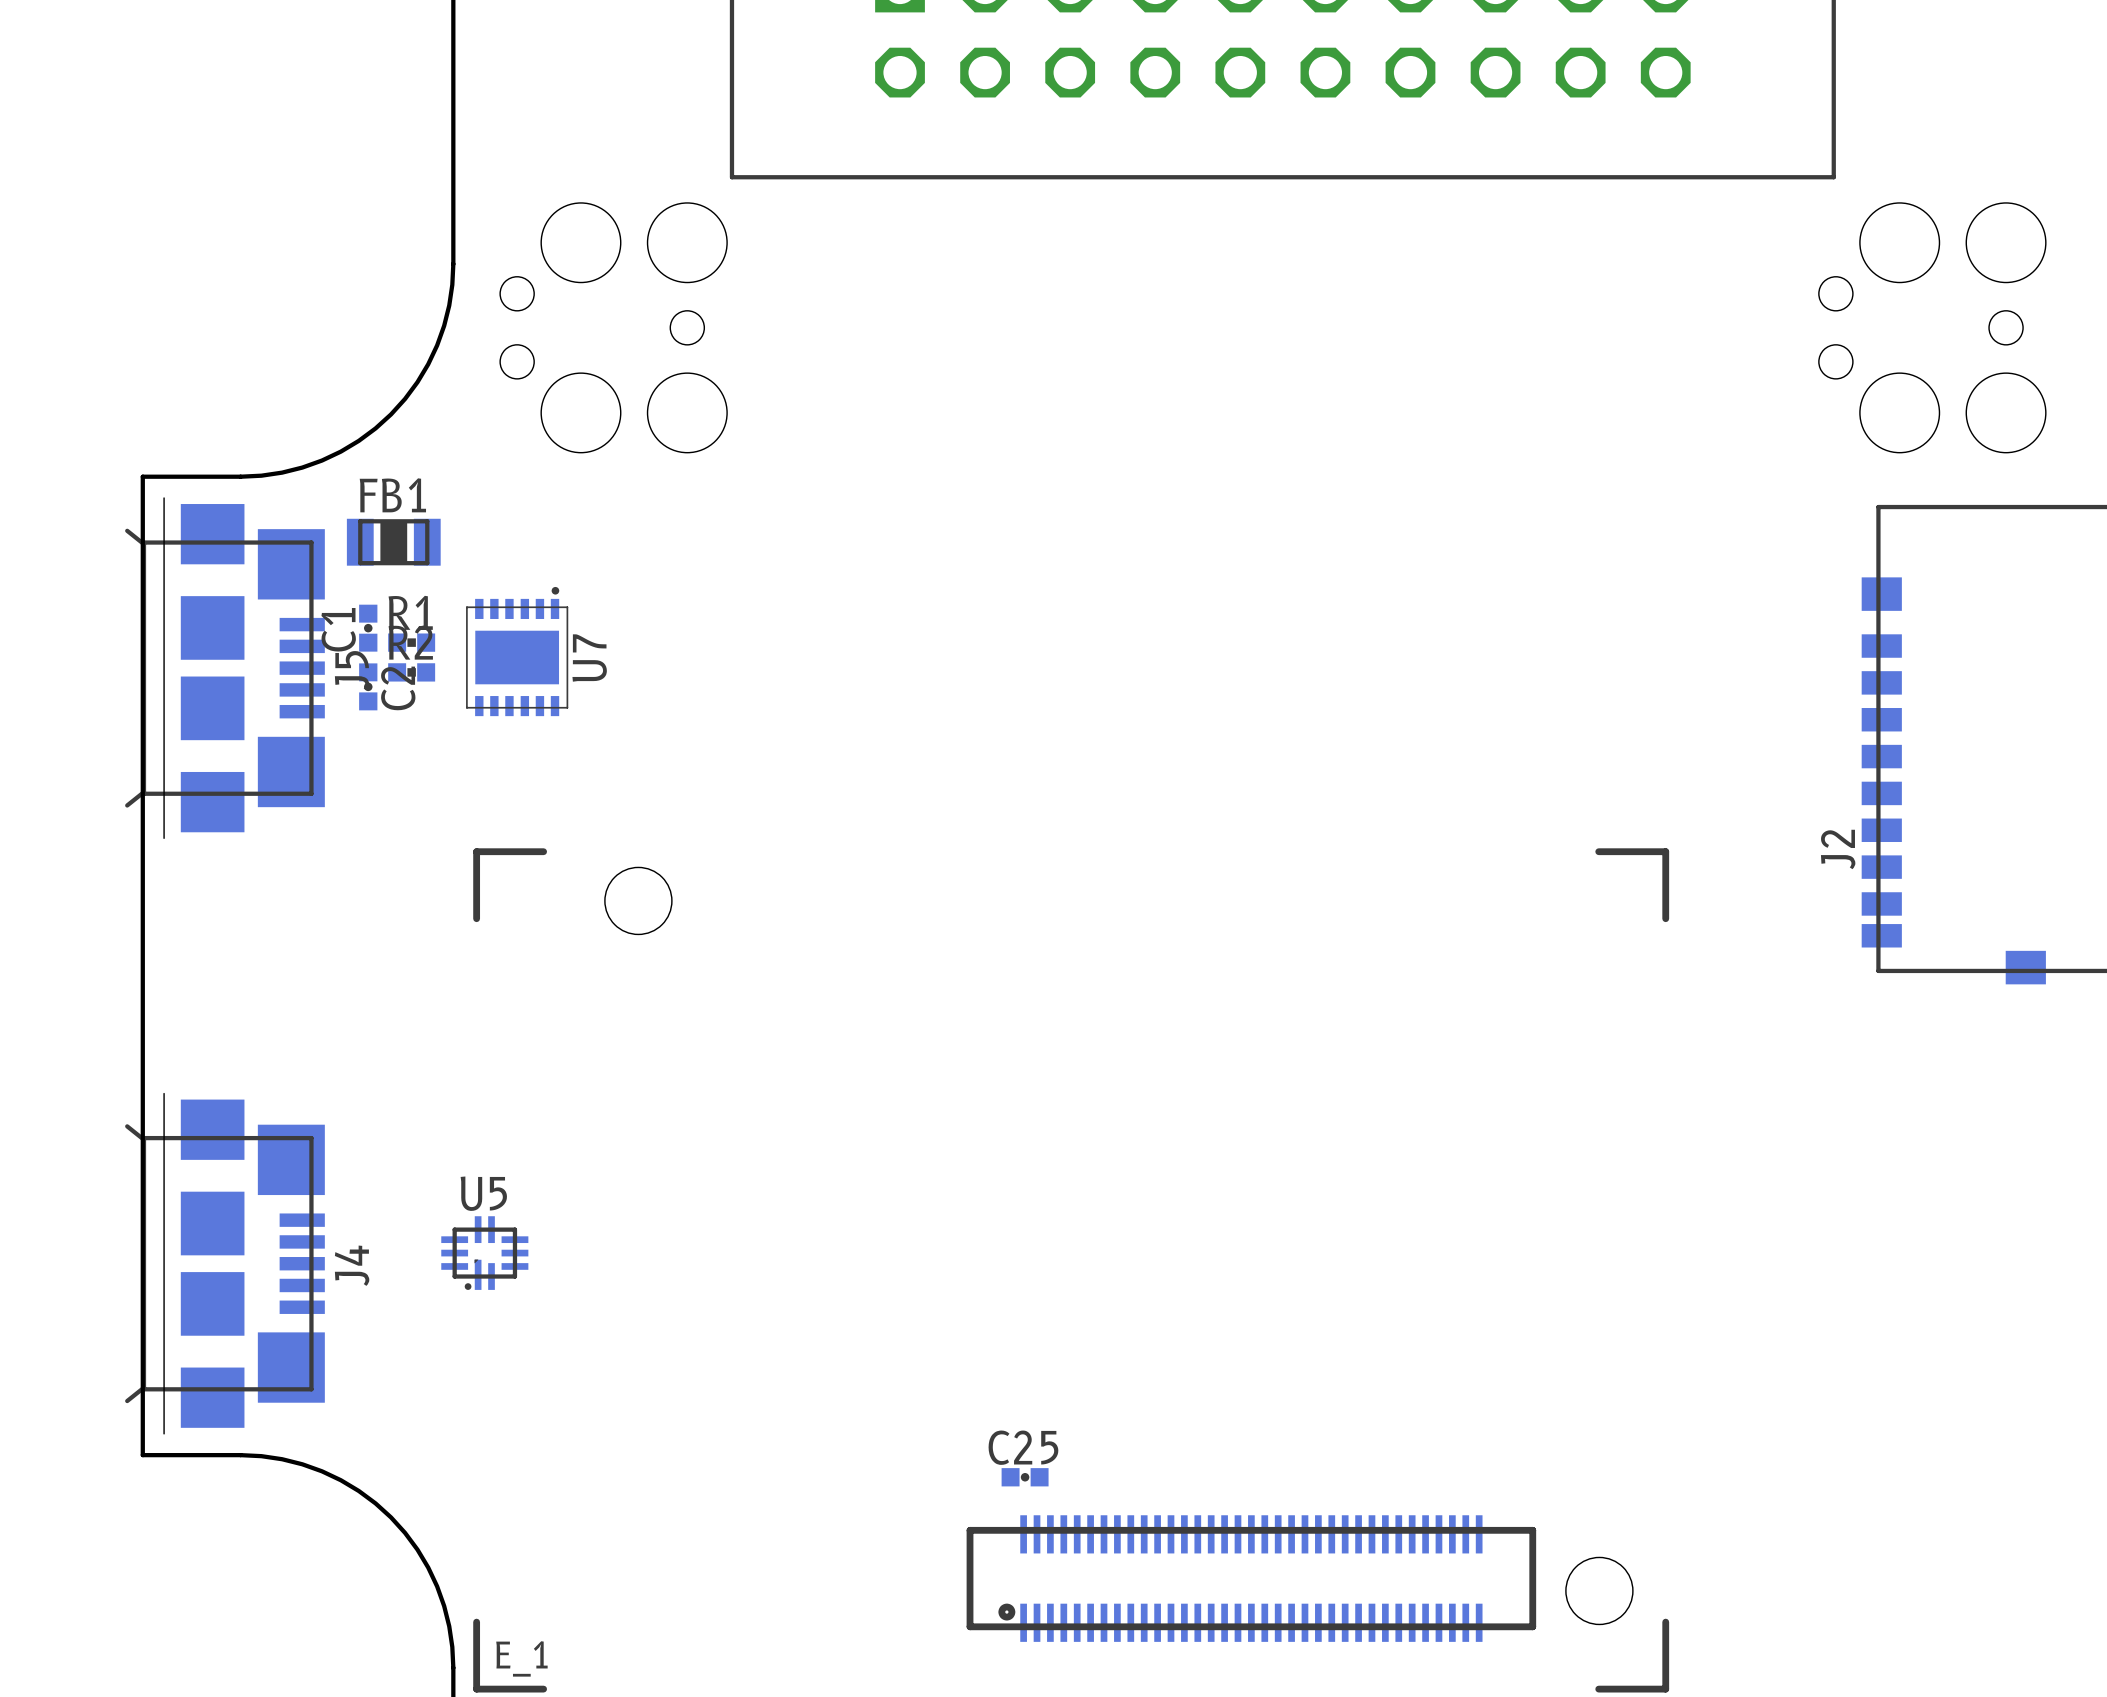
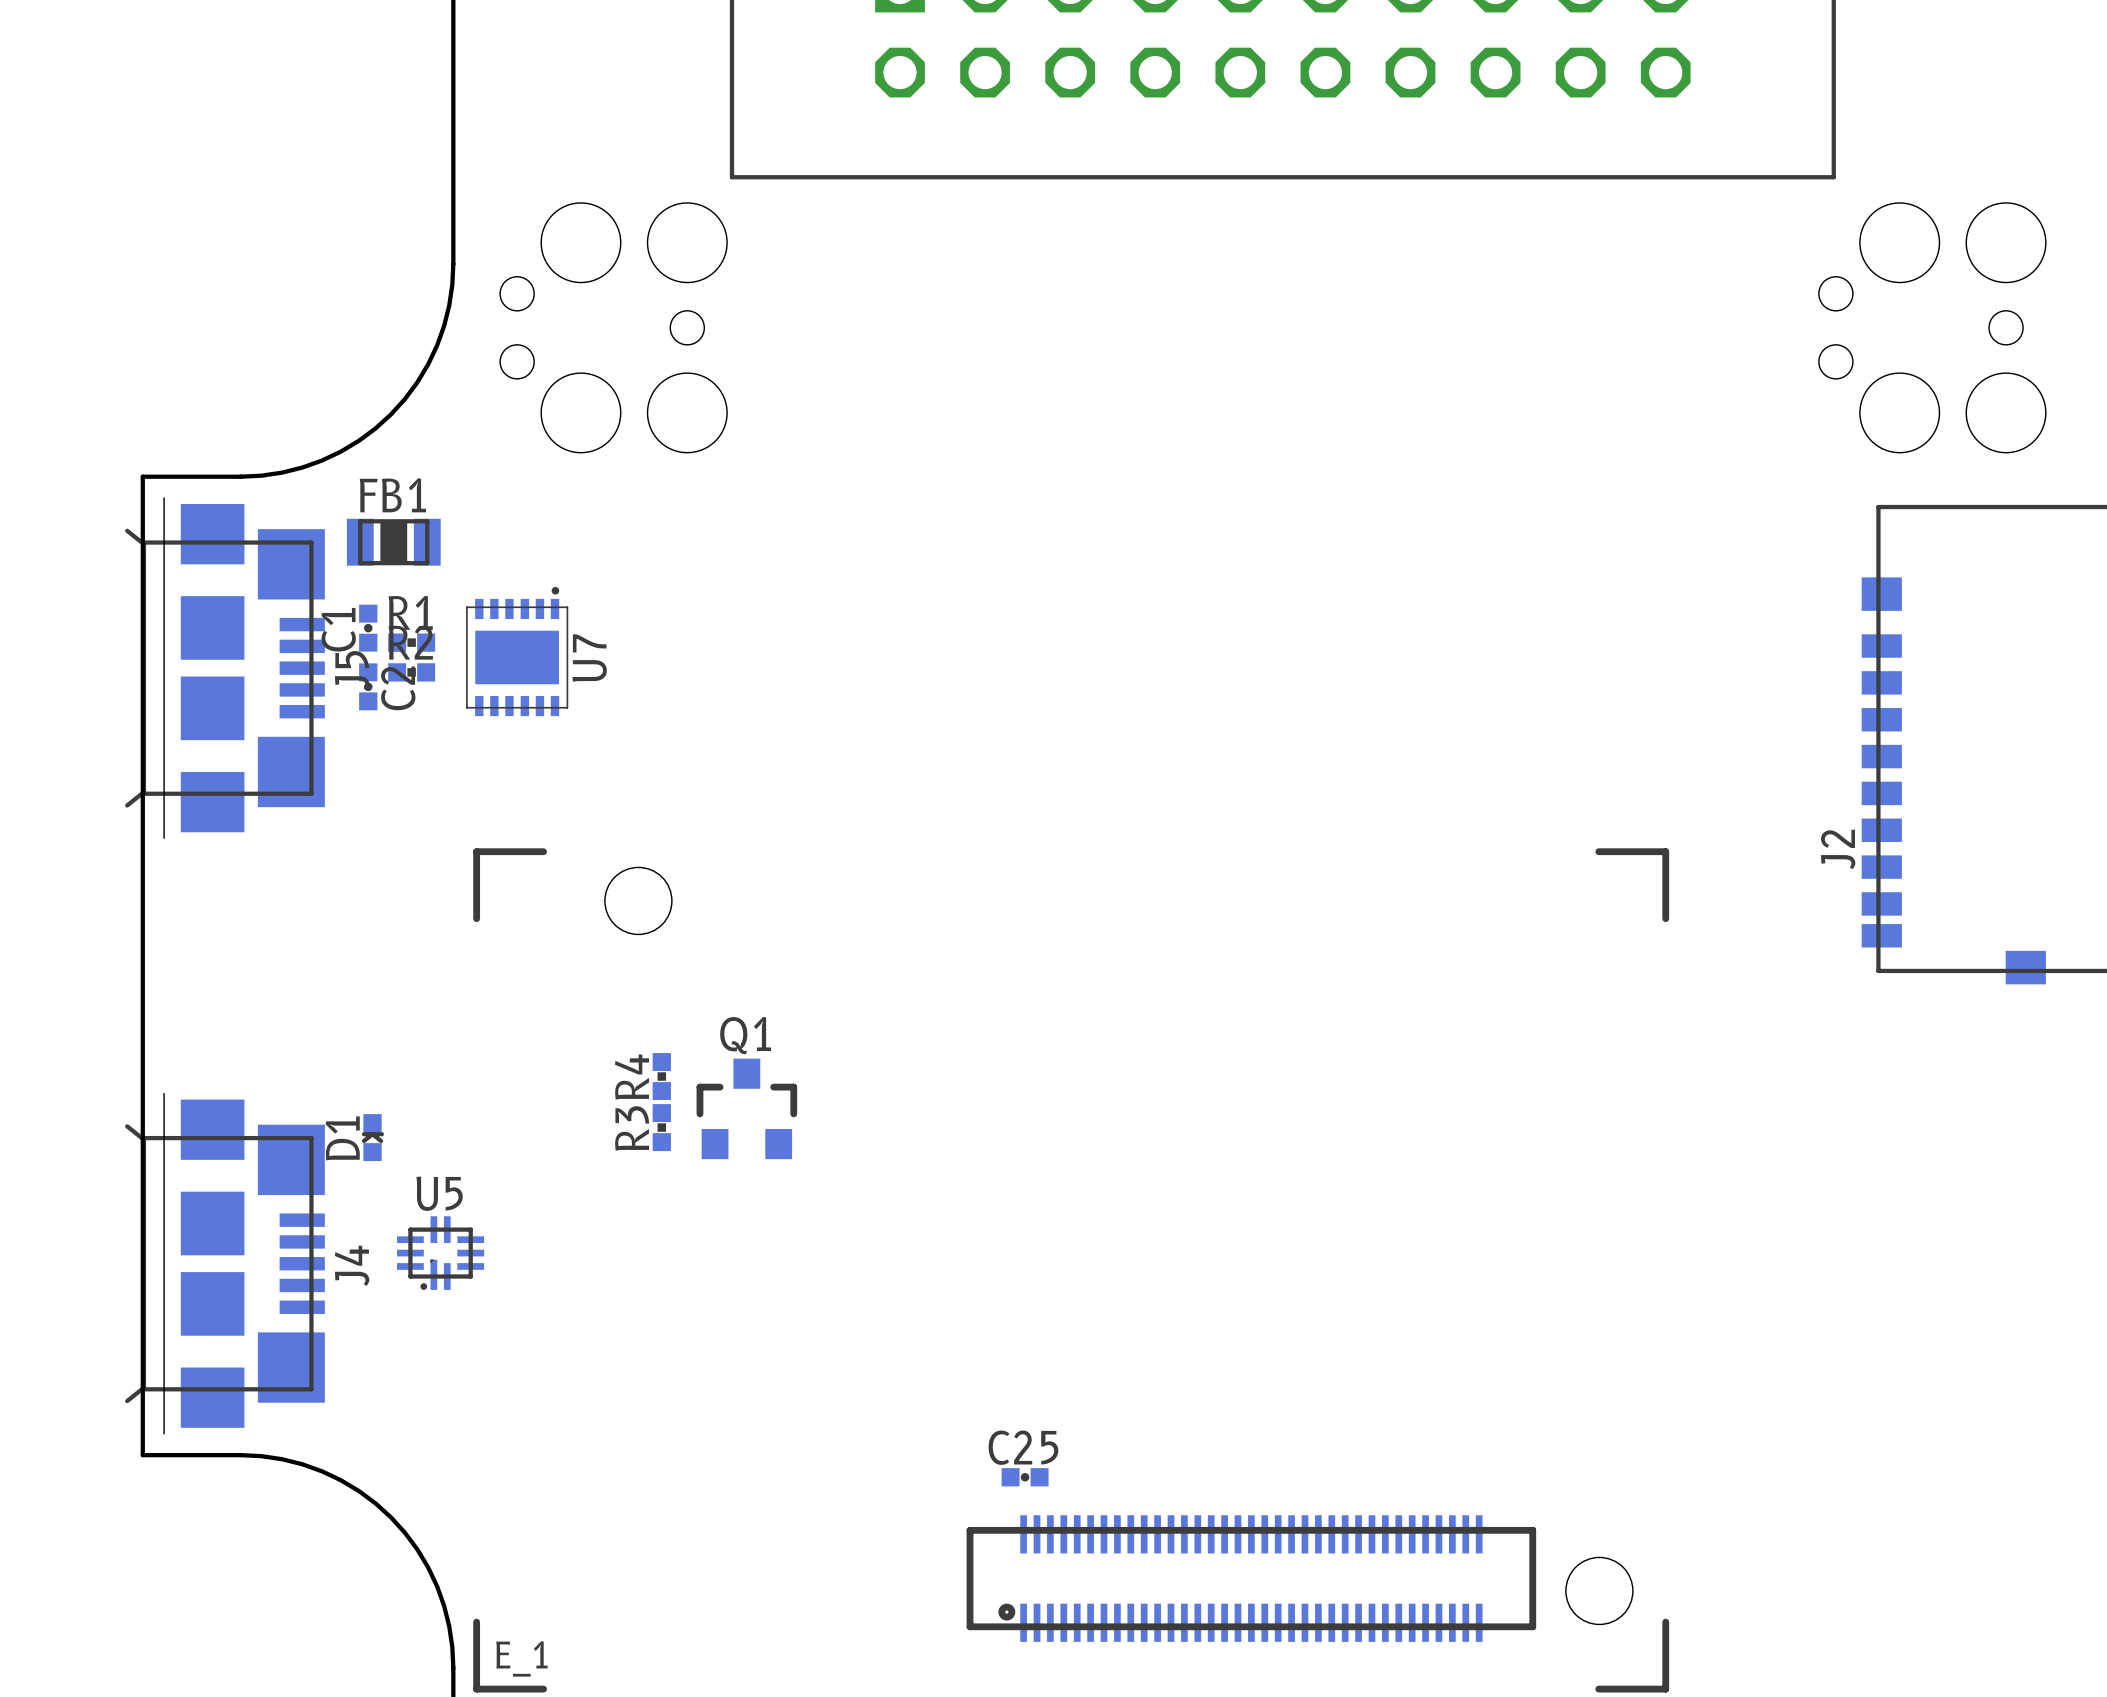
R4: none -> (661, 1076)
Q1: none -> (746, 1108)
R3: none -> (661, 1127)
D1: none -> (372, 1137)
U5 position: (484, 1253) -> (440, 1253)

